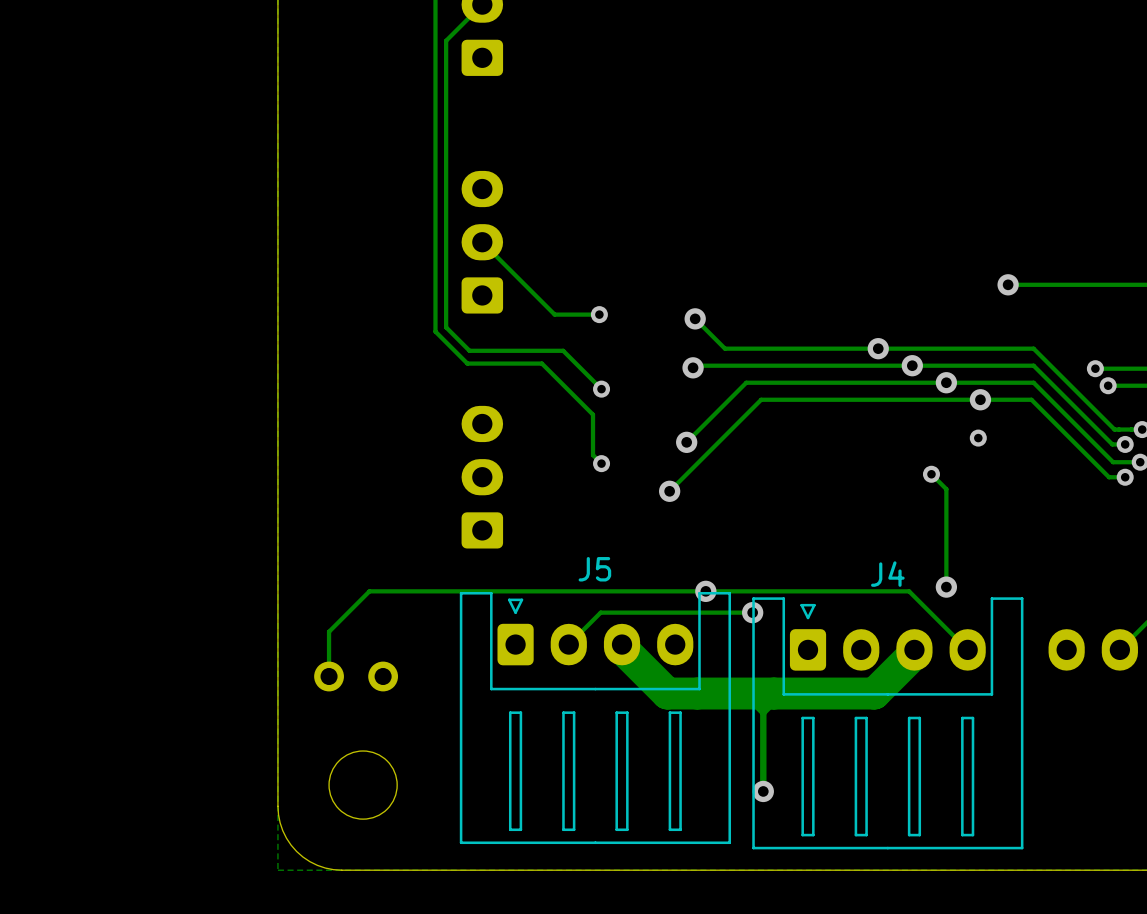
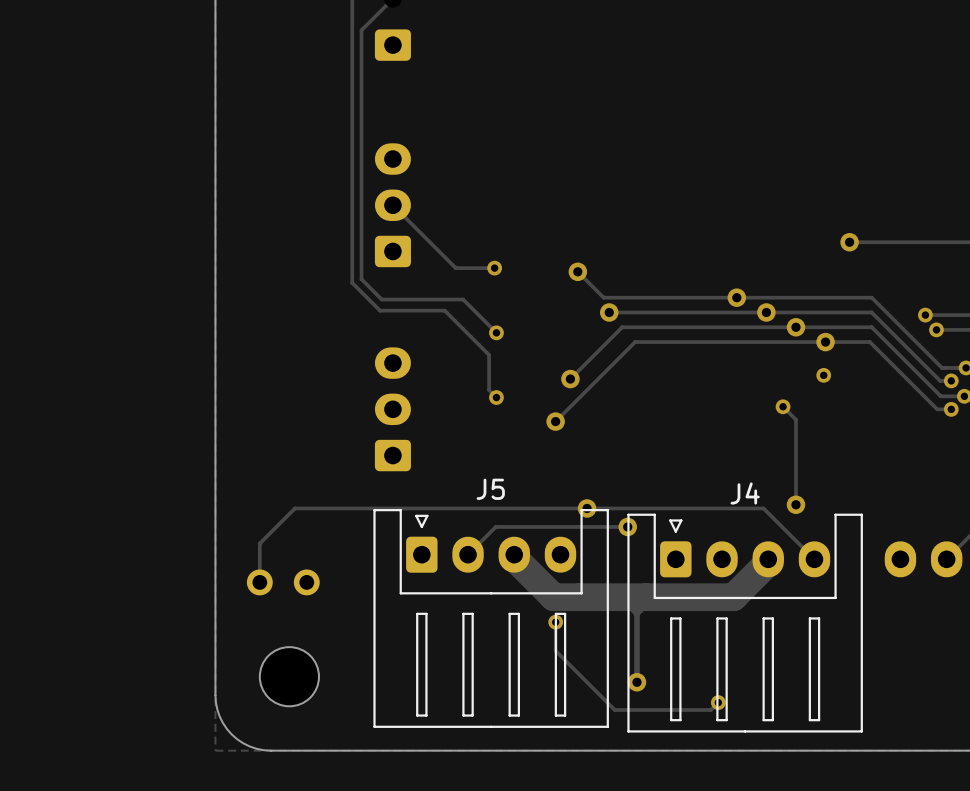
track: (731, 365) (695, 365) (693, 367) -> none
via position: (693, 367) -> (609, 312)
track: none -> (555, 622) (555, 650) (614, 709) (710, 709) (718, 702)
via: none -> (555, 622)
via: none -> (718, 702)

